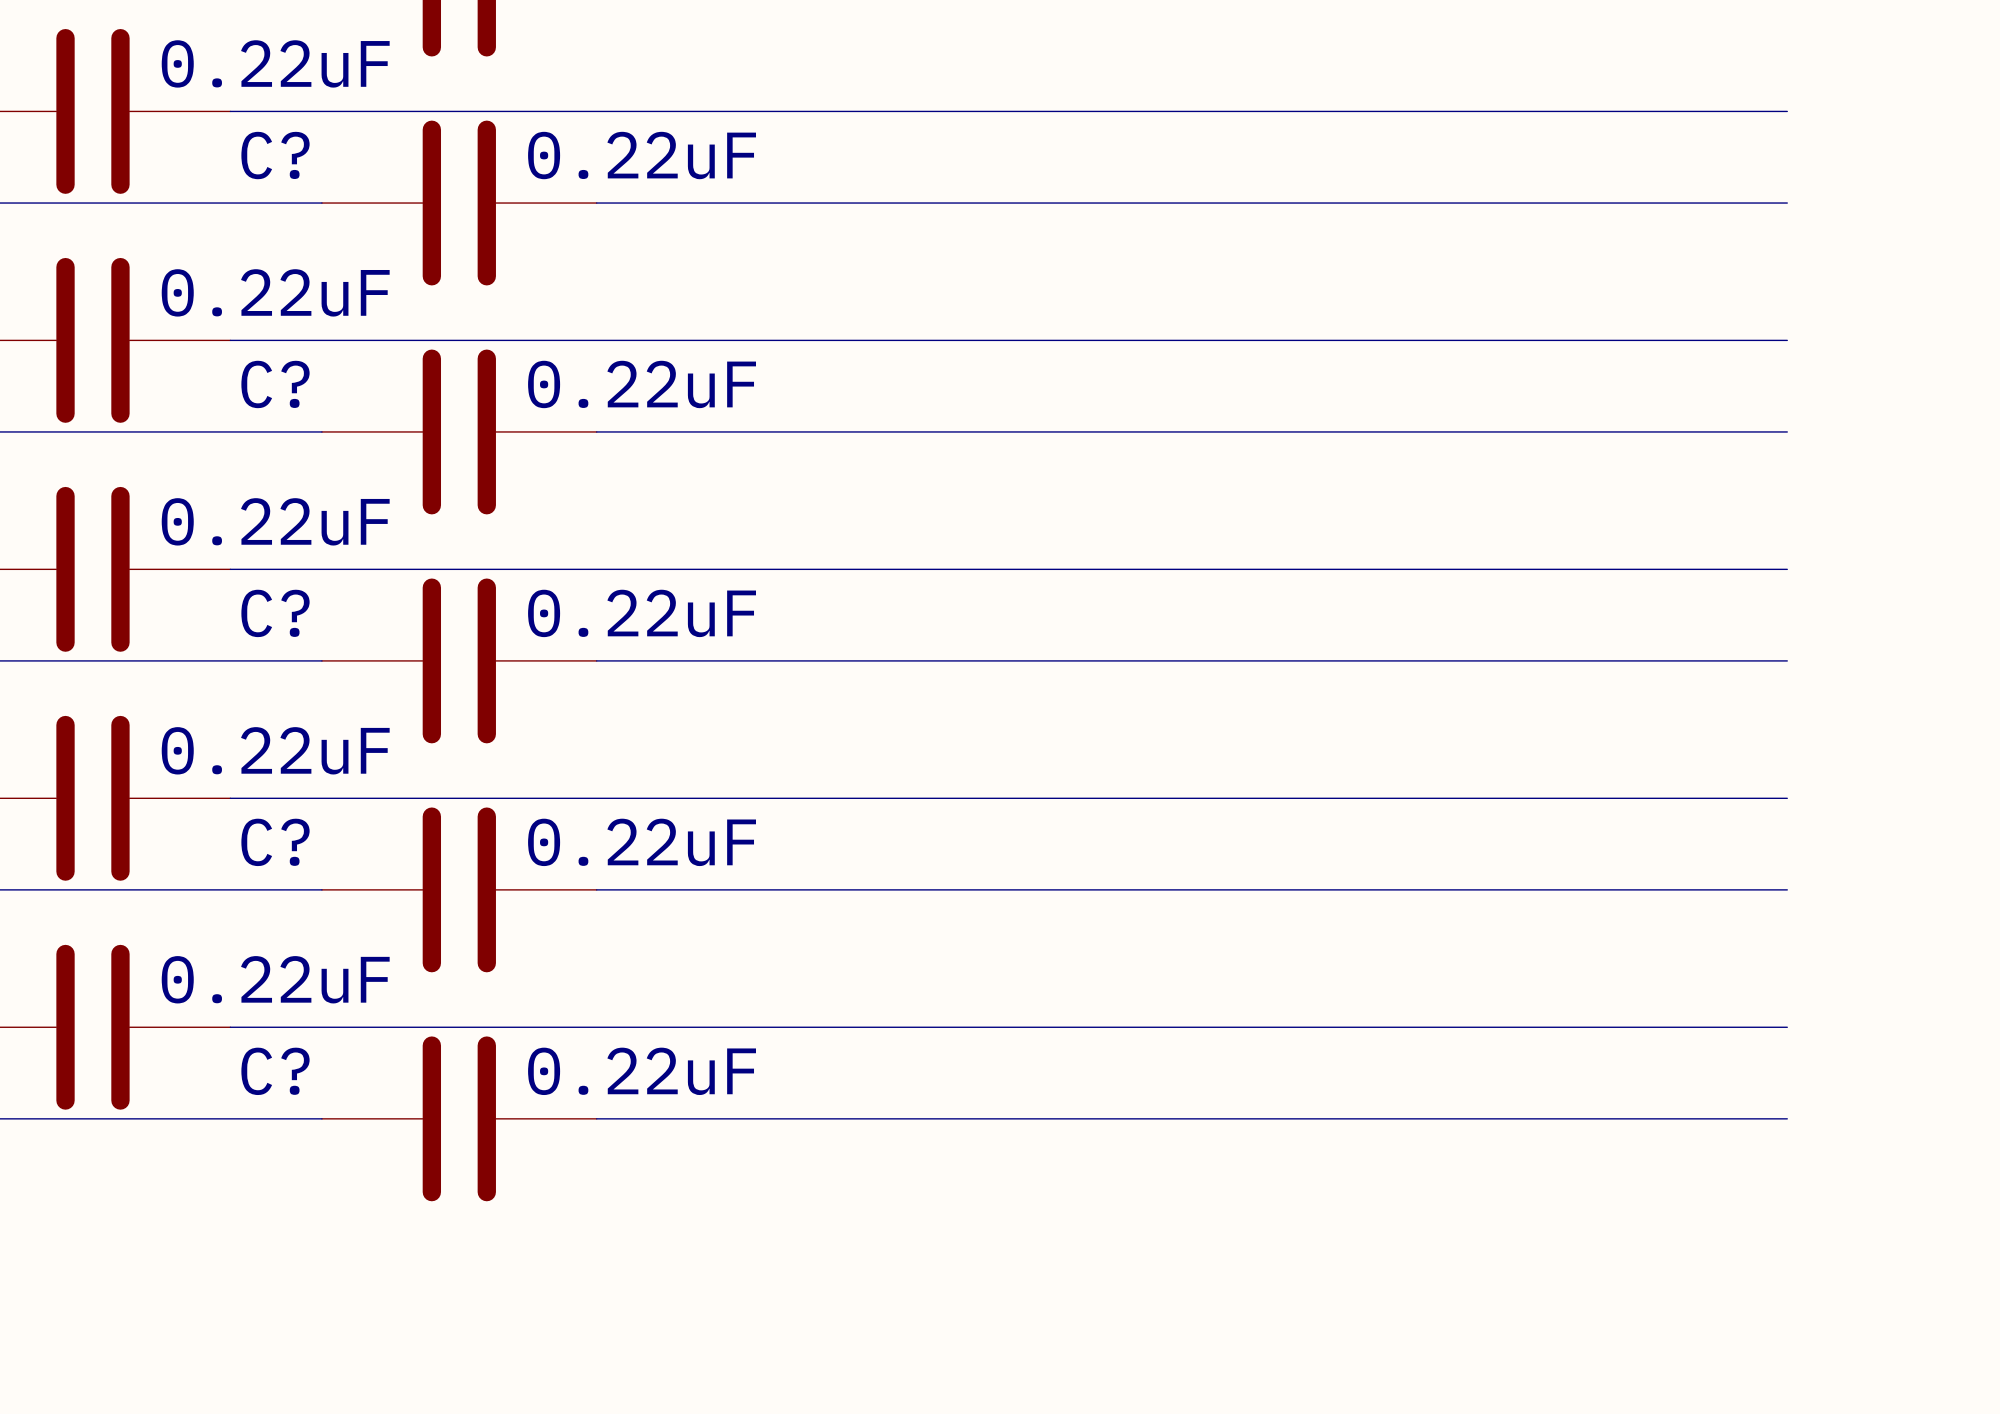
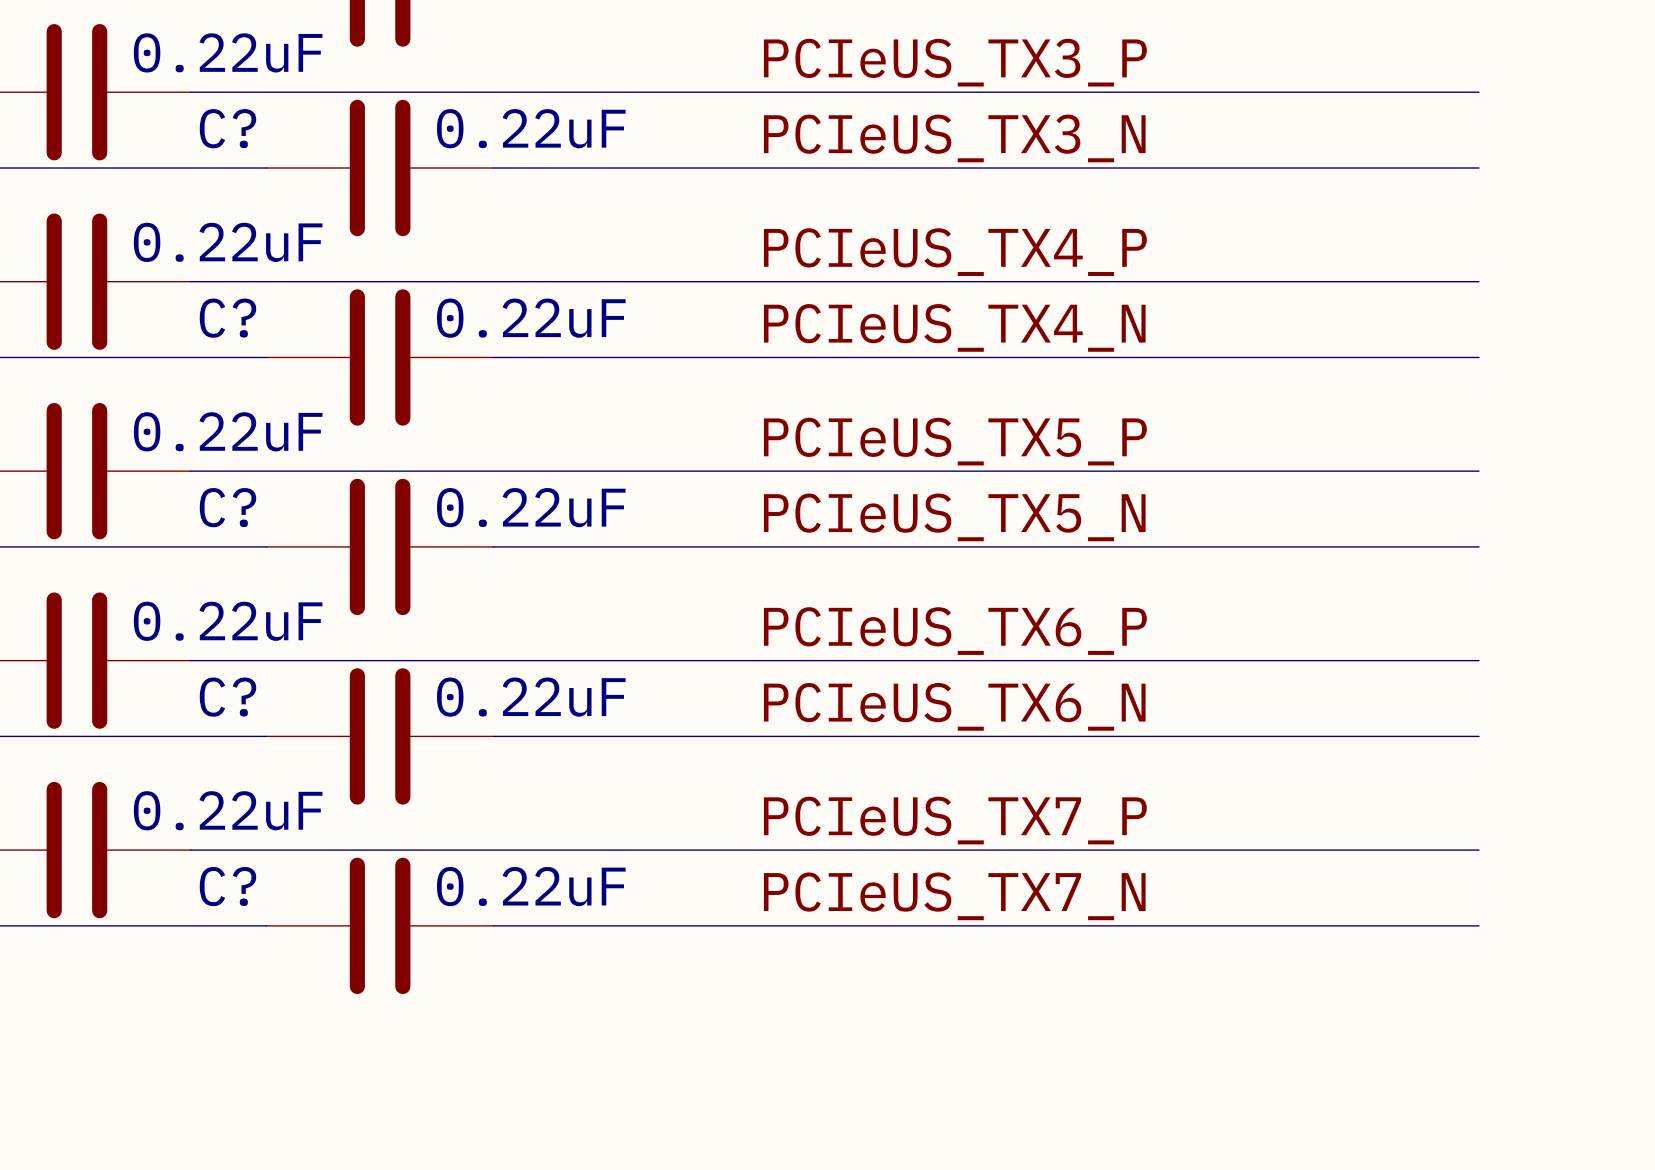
label: none -> PCIeUS_TX3_P (955, 62)
label: none -> PCIeUS_TX3_N (954, 138)
label: none -> PCIeUS_TX4_P (955, 252)
label: none -> PCIeUS_TX4_N (954, 327)
label: none -> PCIeUS_TX5_P (955, 441)
label: none -> PCIeUS_TX5_N (954, 517)
label: none -> PCIeUS_TX6_P (955, 631)
label: none -> PCIeUS_TX6_N (954, 706)
label: none -> PCIeUS_TX7_P (955, 820)
label: none -> PCIeUS_TX7_N (954, 896)

